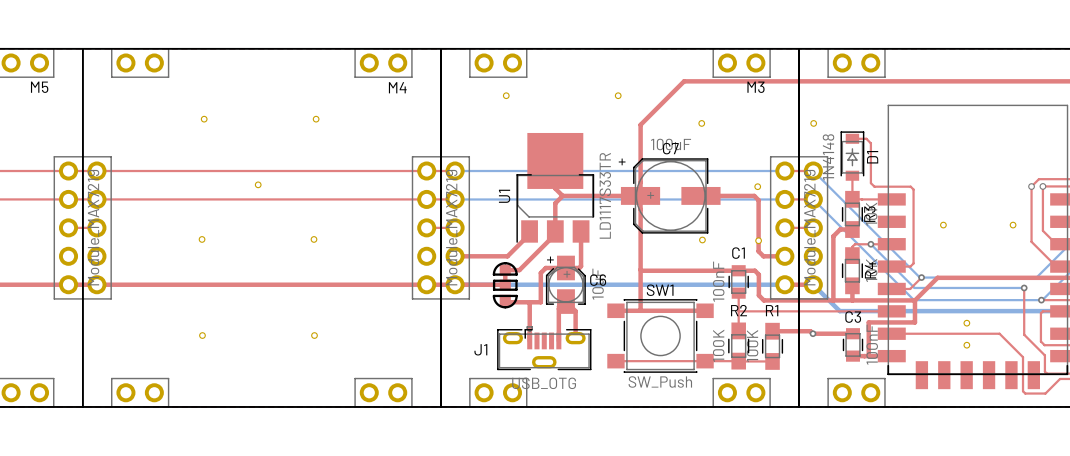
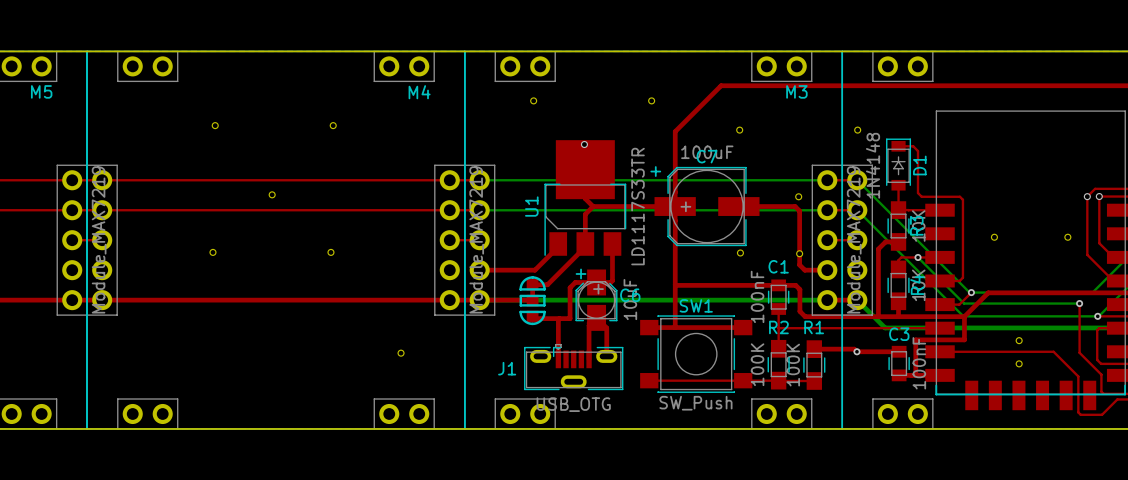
via: none -> (584, 144)
part: (202, 335) -> none
part position: (314, 335) -> (401, 353)

